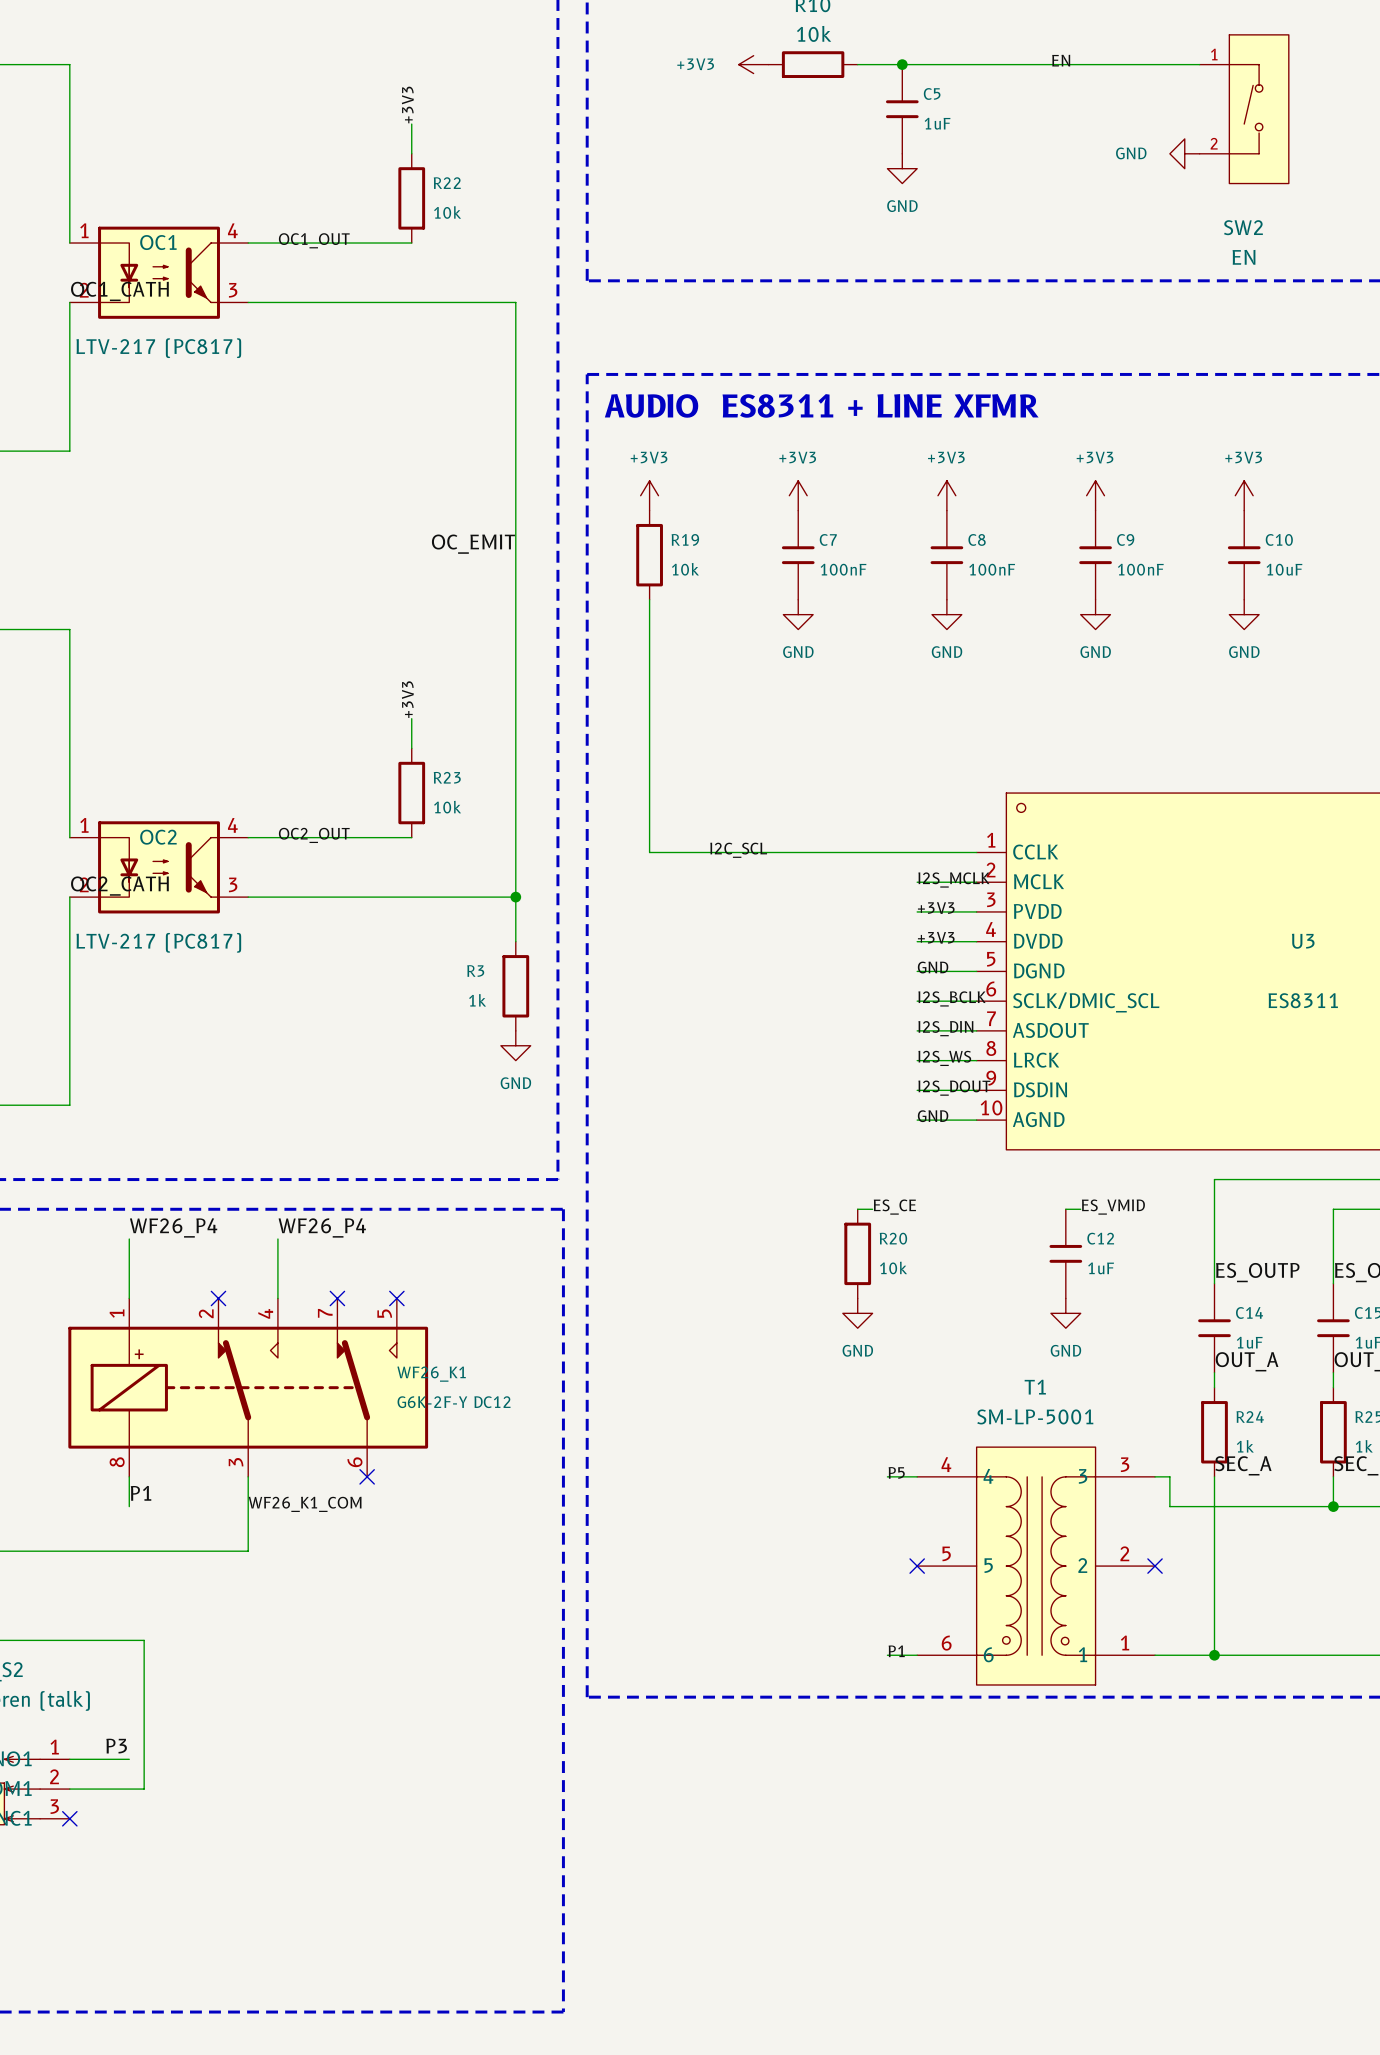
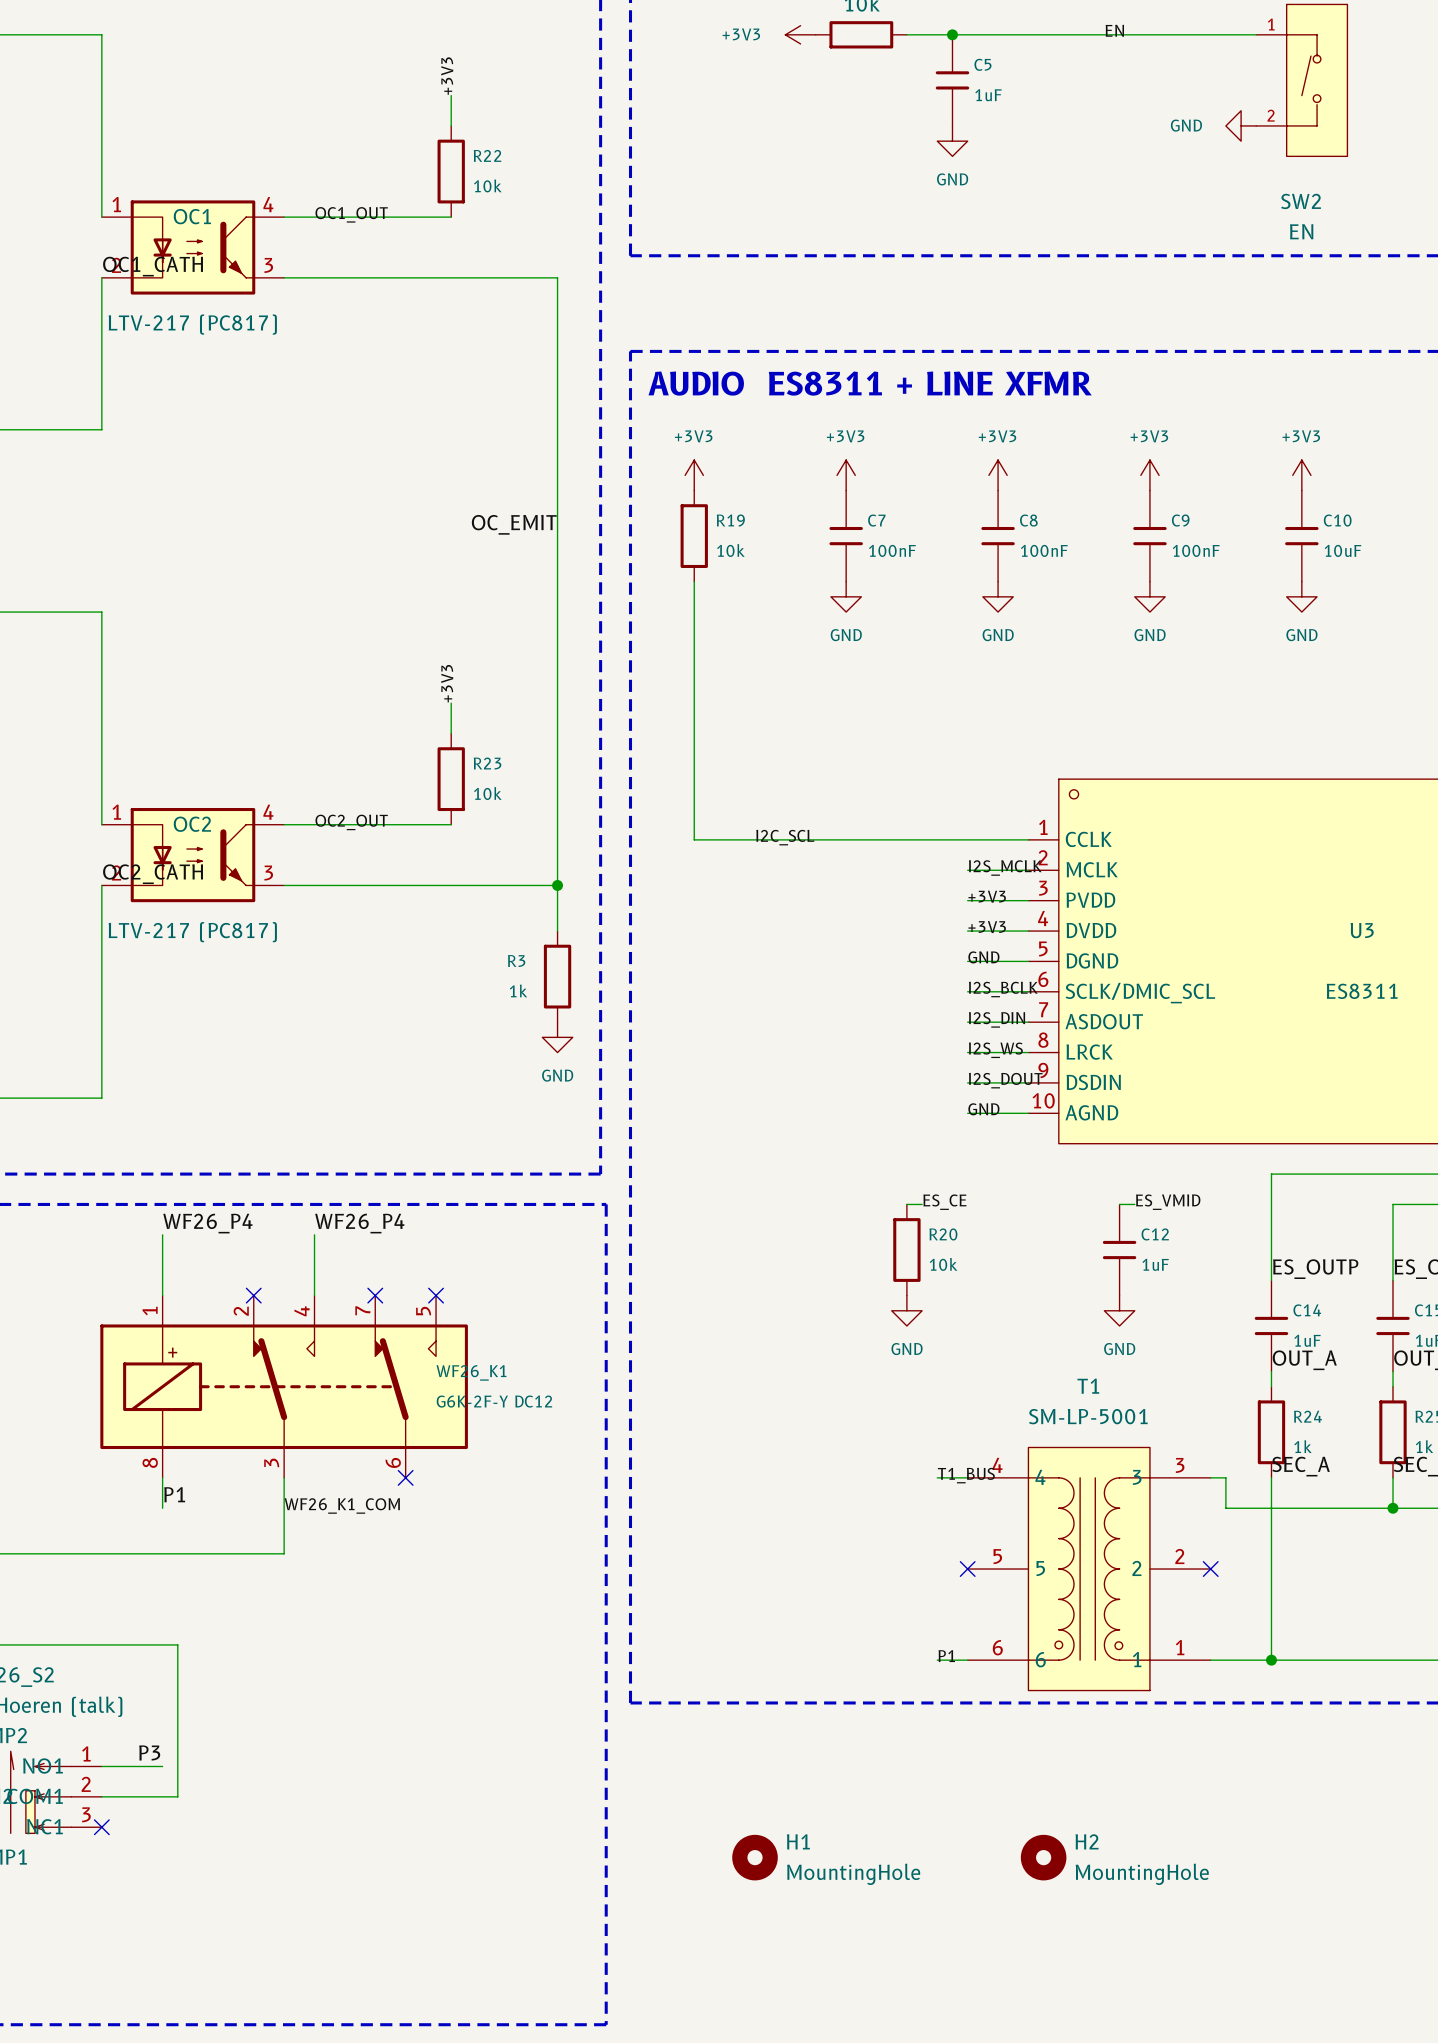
label: P5 (896, 1472) -> T1_BUS (966, 1475)
H1: none -> MountingHole (755, 1857)
H2: none -> MountingHole (1043, 1857)

